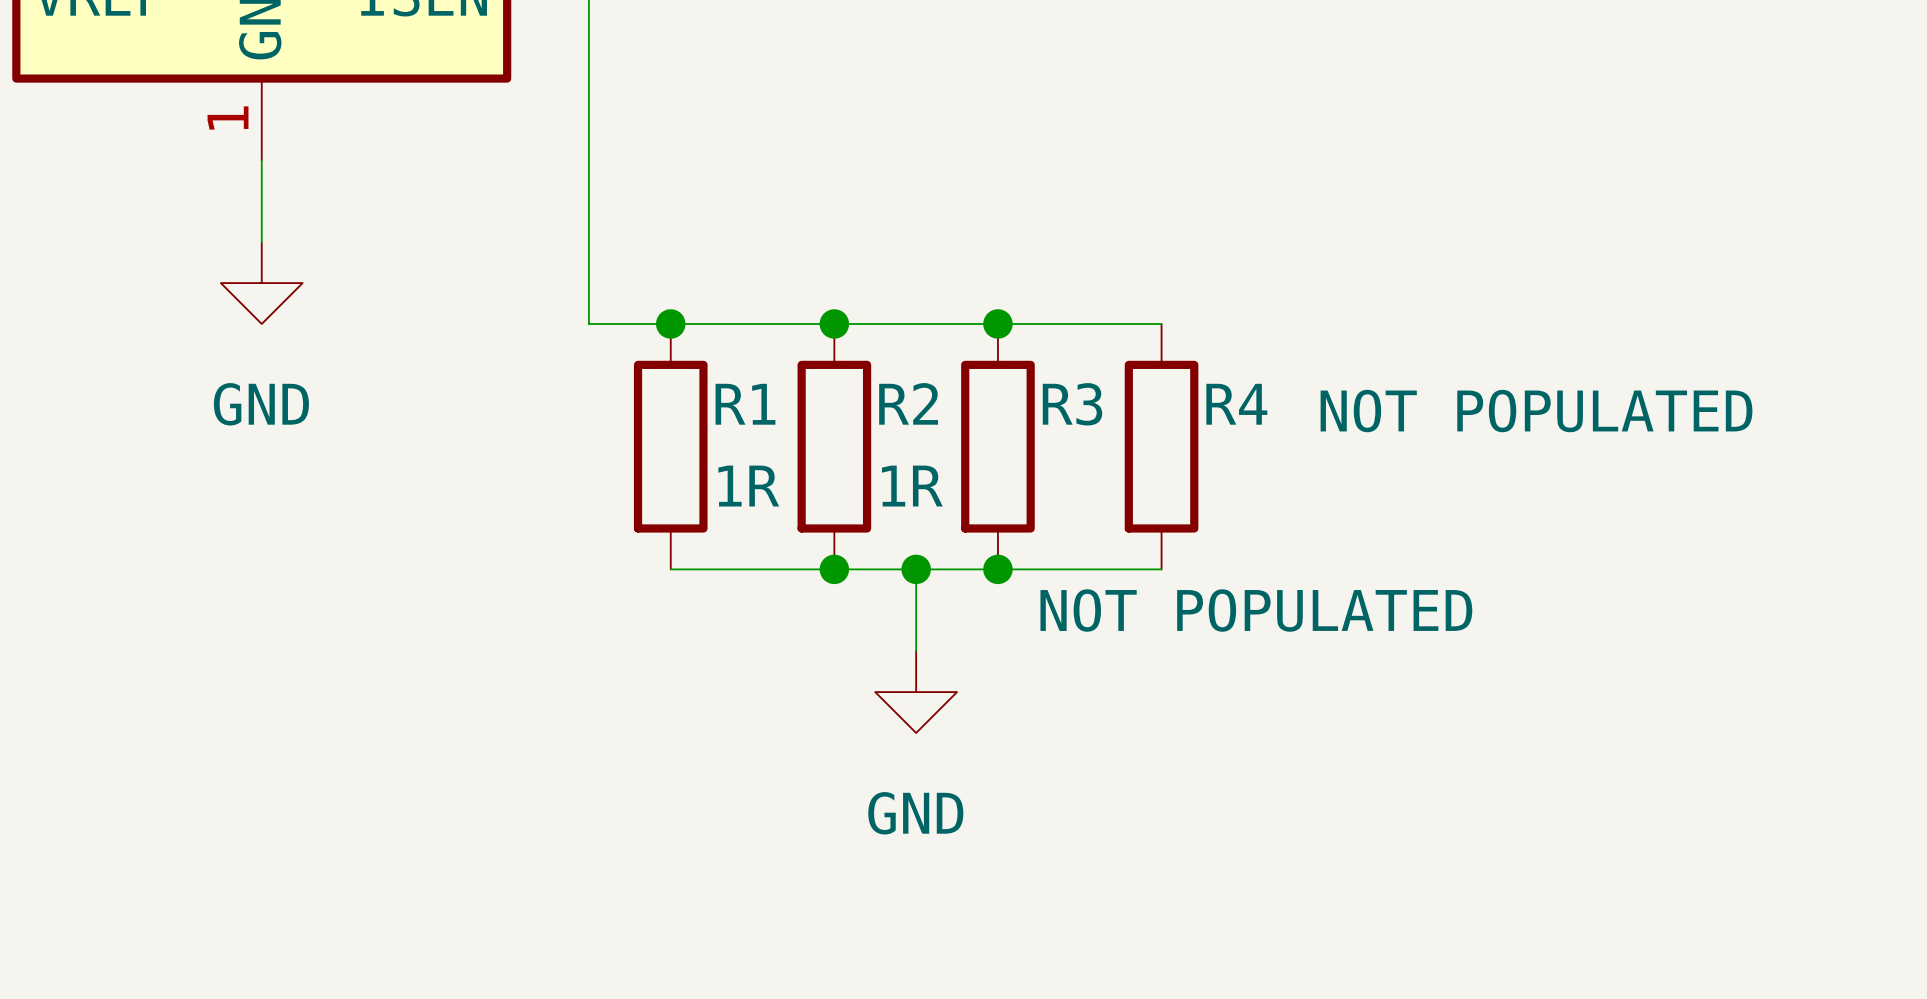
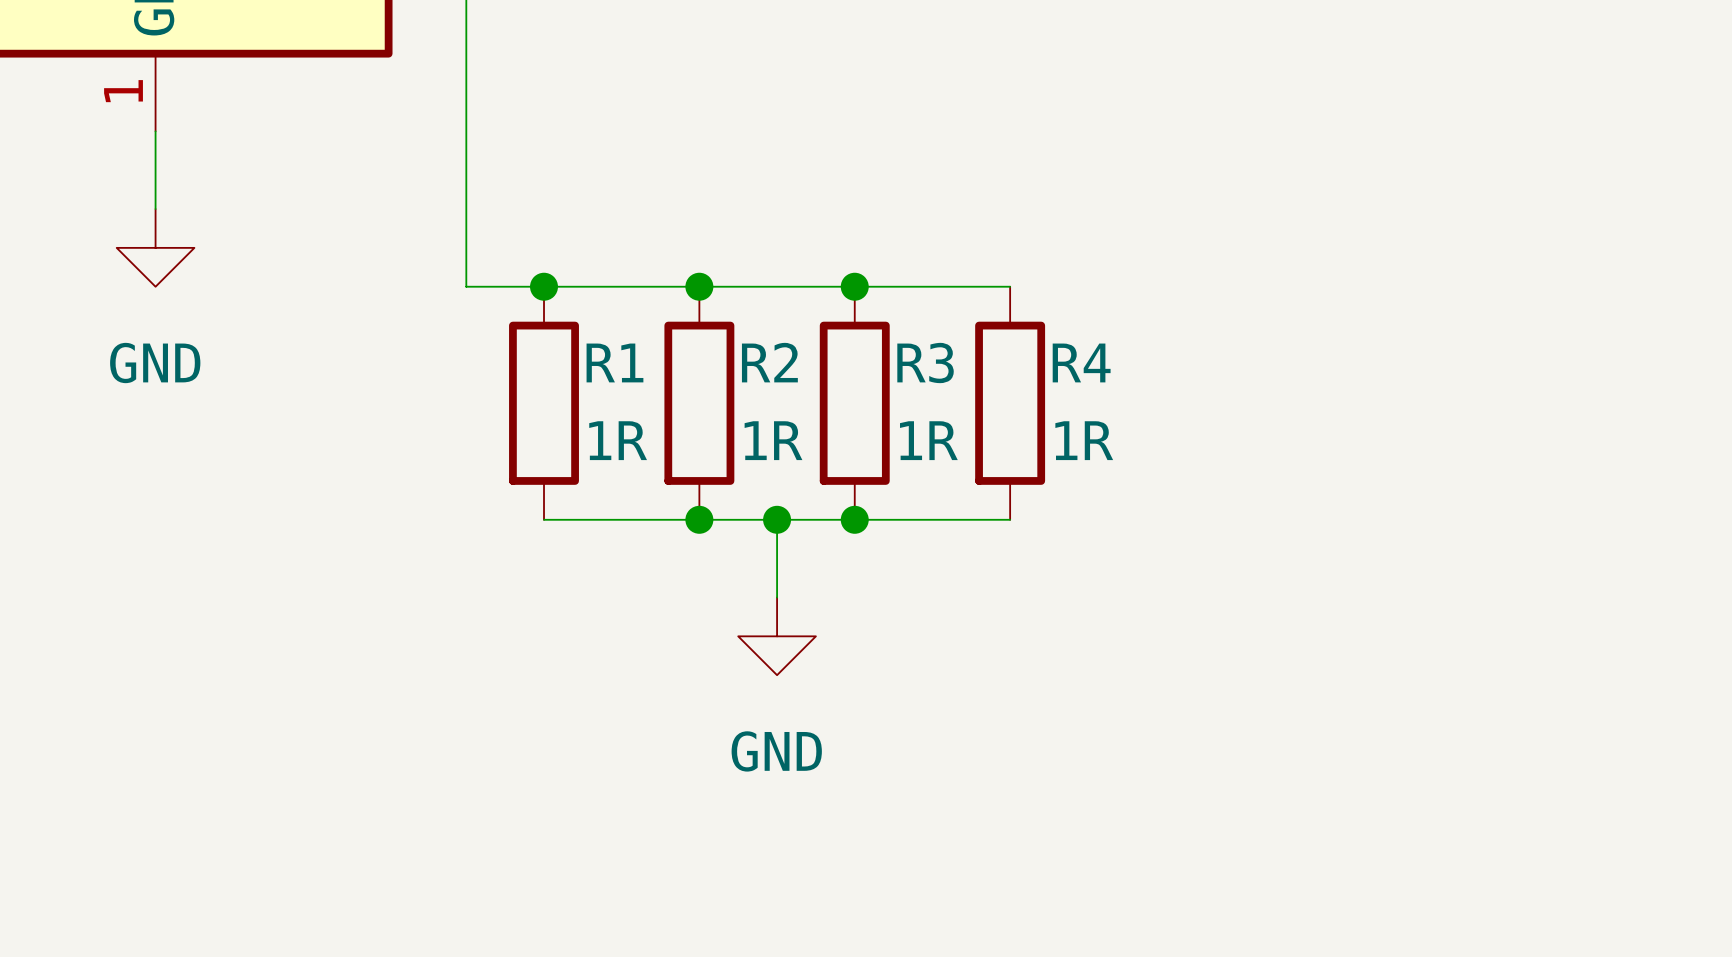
R4 value: NOT POPULATED (1536, 411) -> 1R (1084, 440)
R3 value: NOT POPULATED (1256, 610) -> 1R (928, 440)

